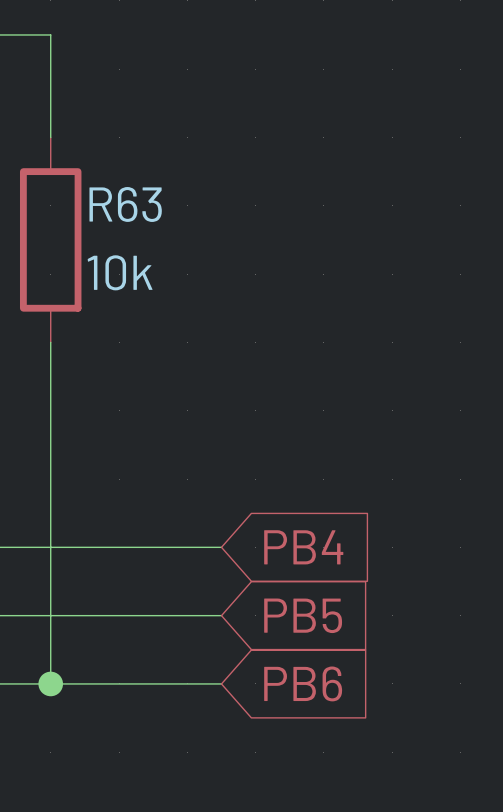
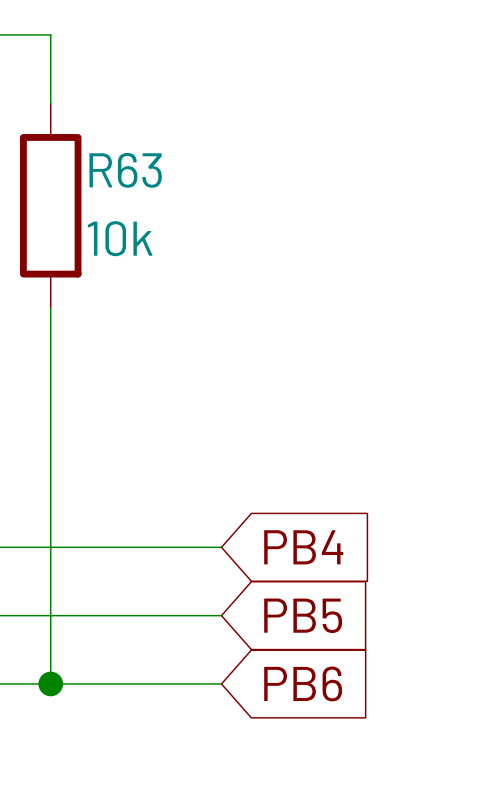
R63 position: (50, 239) -> (50, 205)

